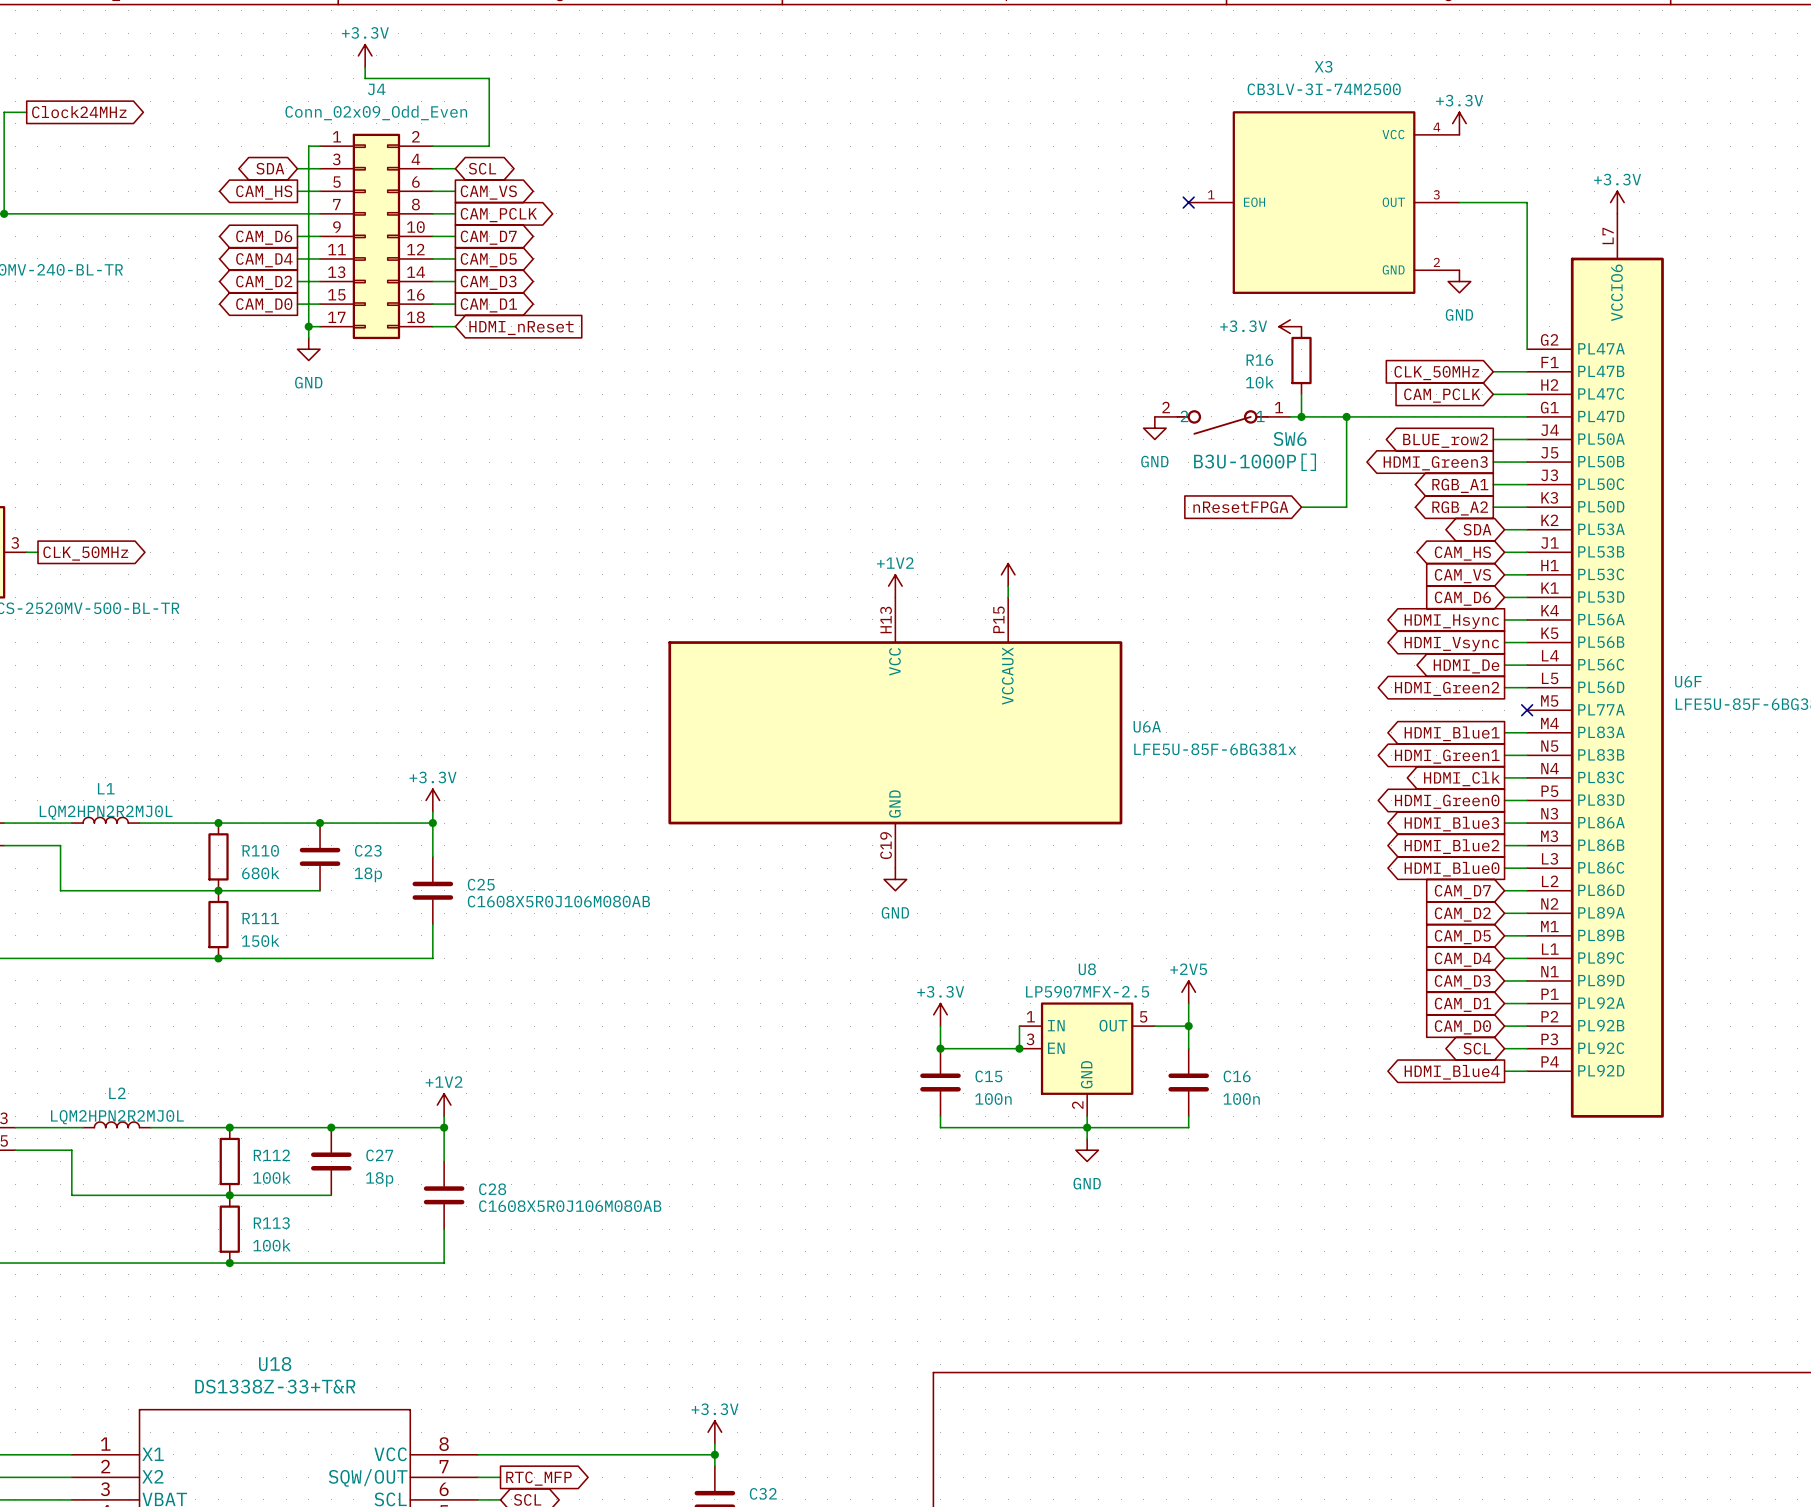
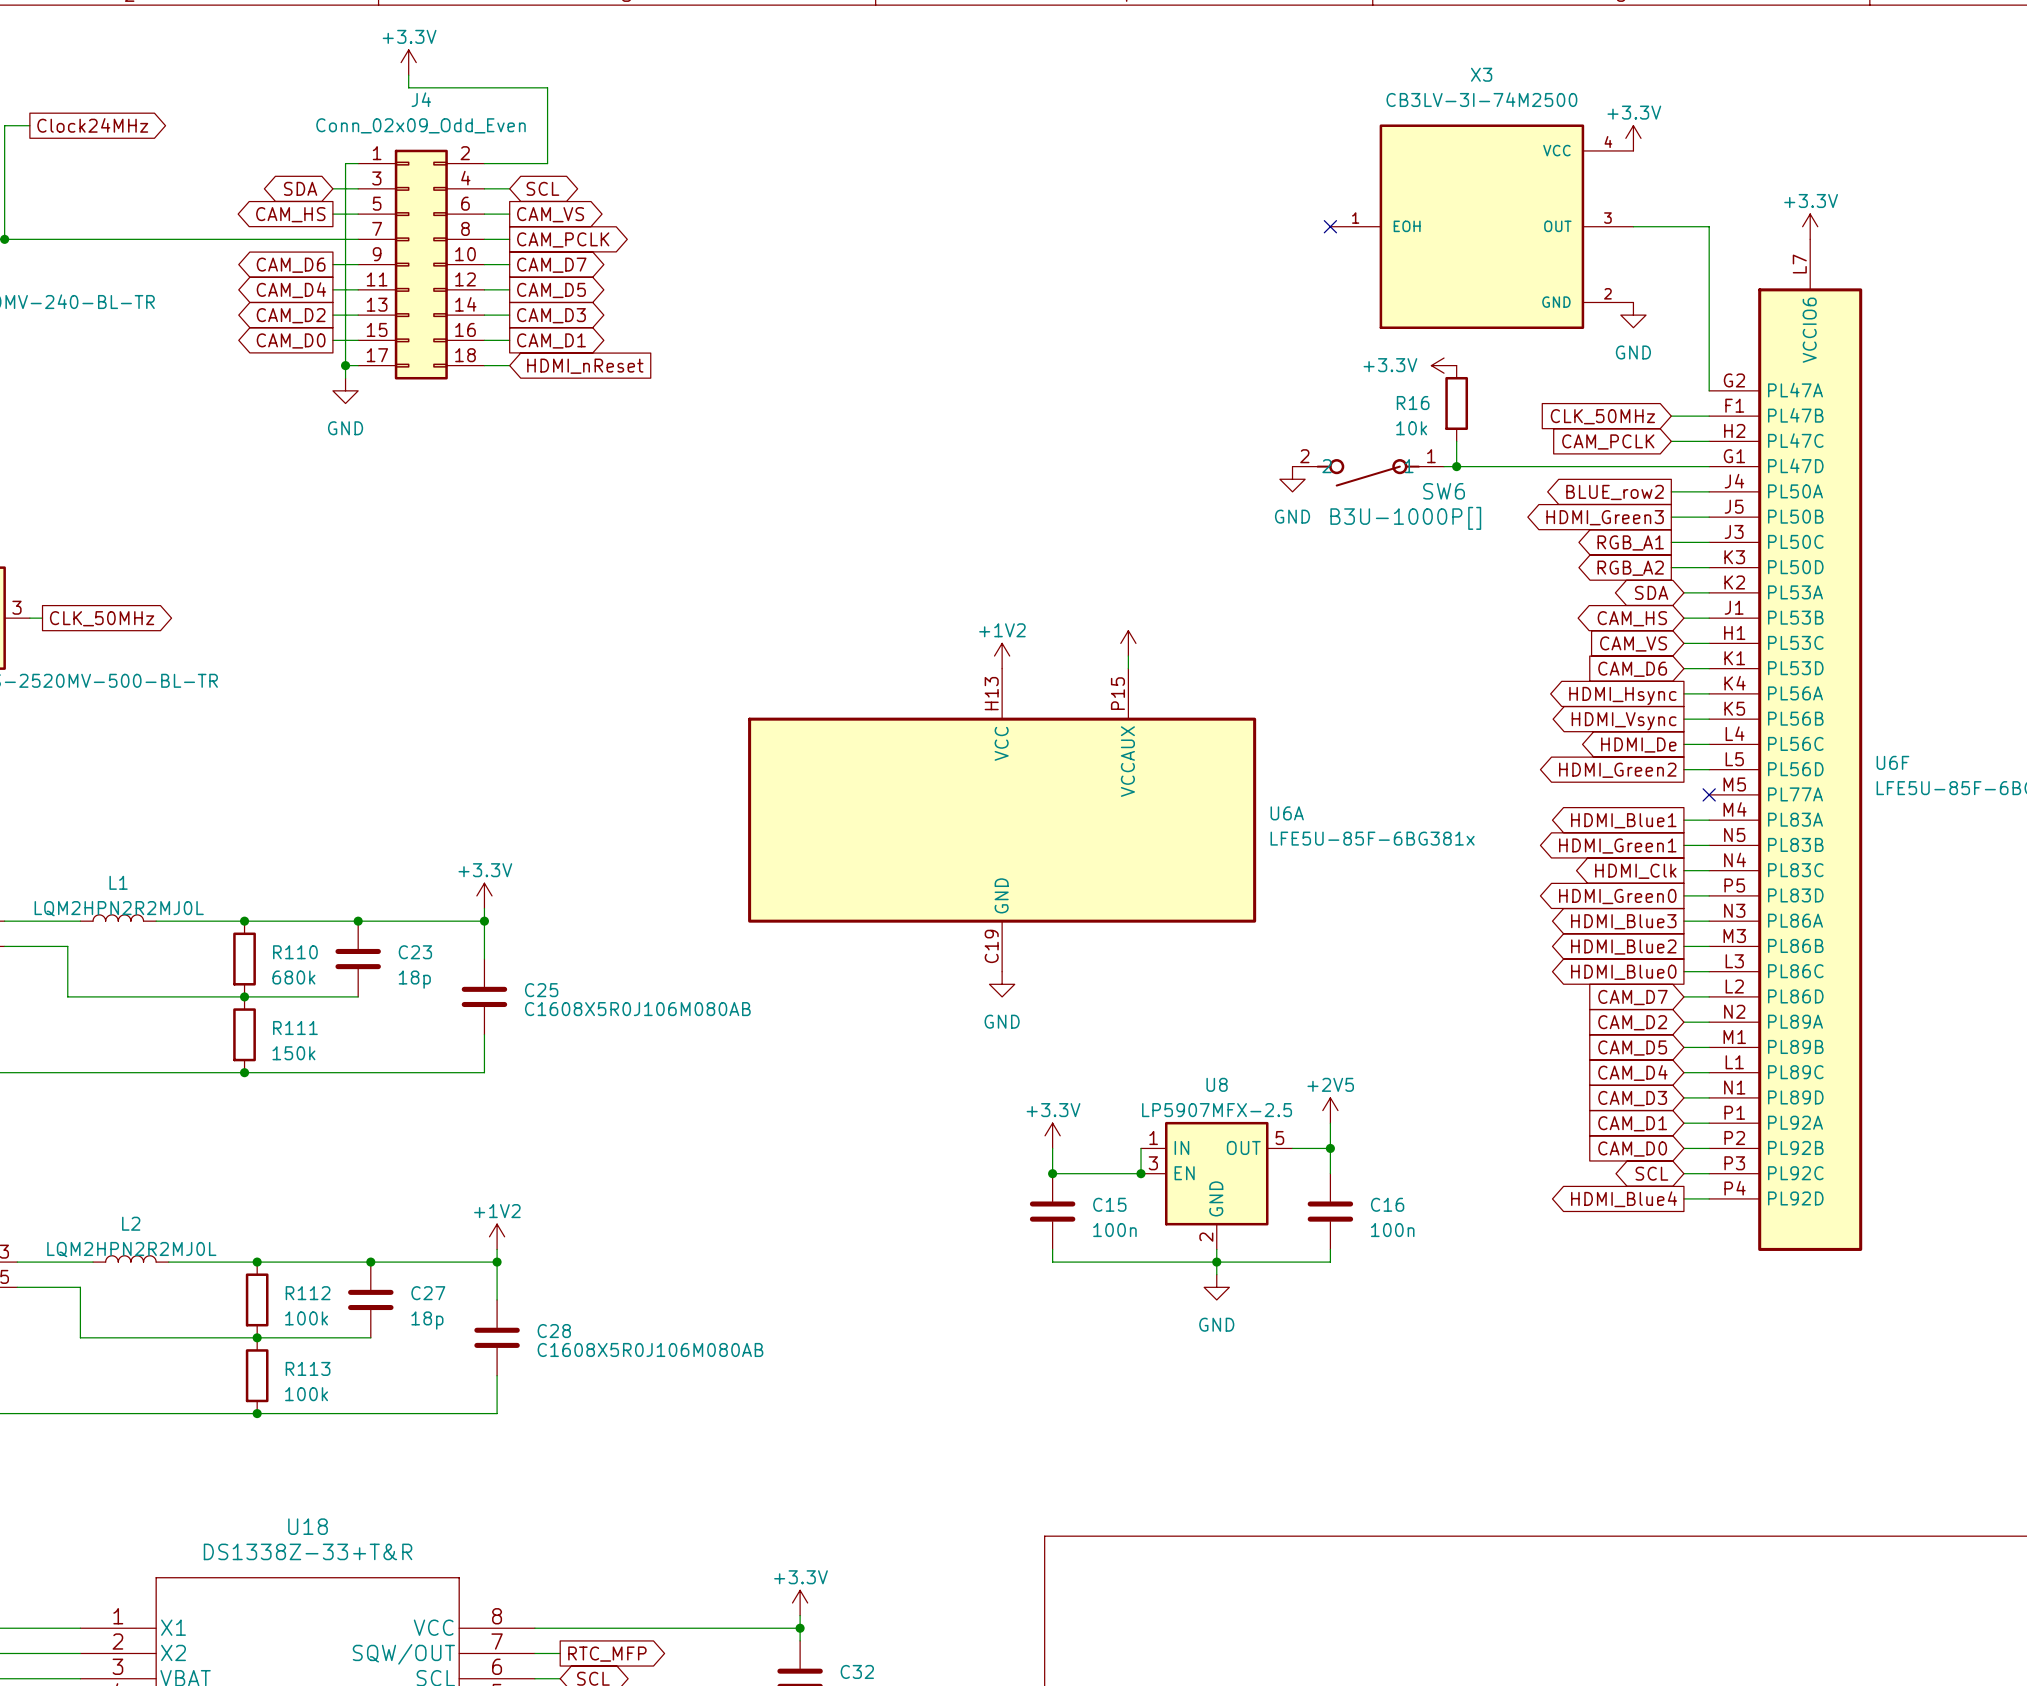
wire: (1346, 416) (1346, 507) (1301, 507) -> none
junction: (1346, 416) -> none
global label: nResetFPGA (1240, 507) -> none

